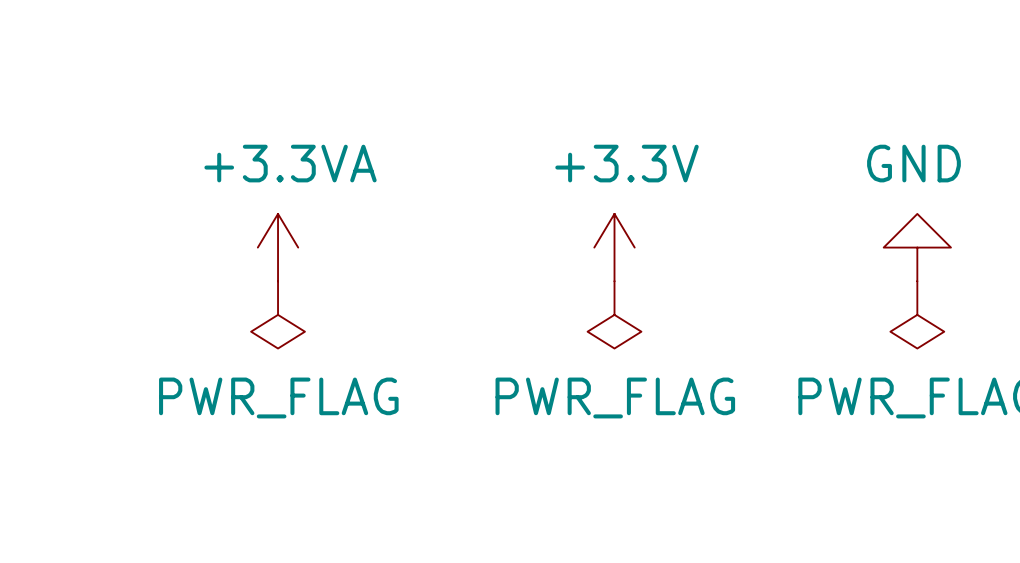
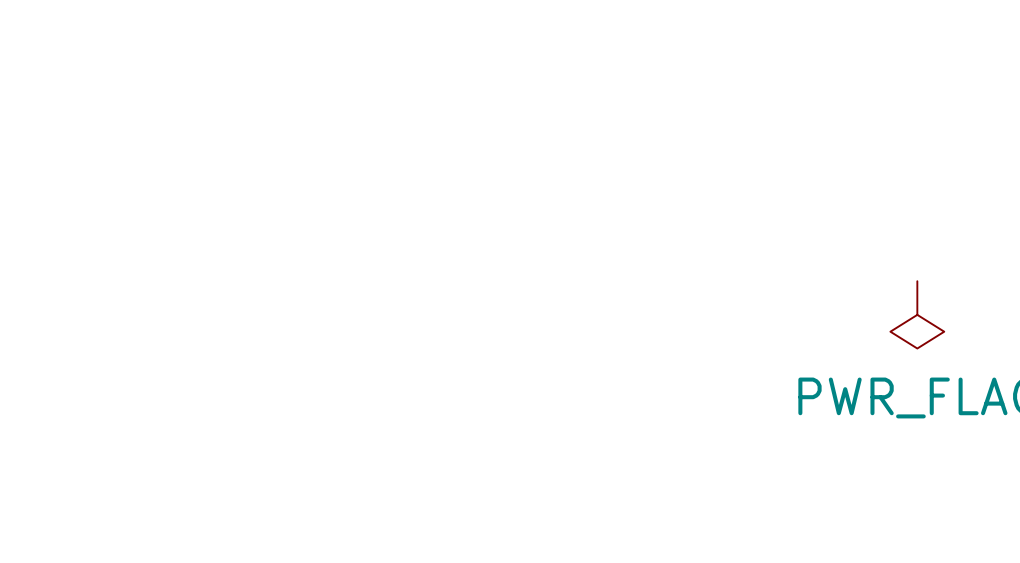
power symbol: +3.3VA (278, 247) -> none
power symbol: +3.3V (614, 247) -> none
power symbol: GND (917, 247) -> none
power symbol: PWR_FLAG (278, 314) -> none
power symbol: PWR_FLAG (614, 314) -> none

